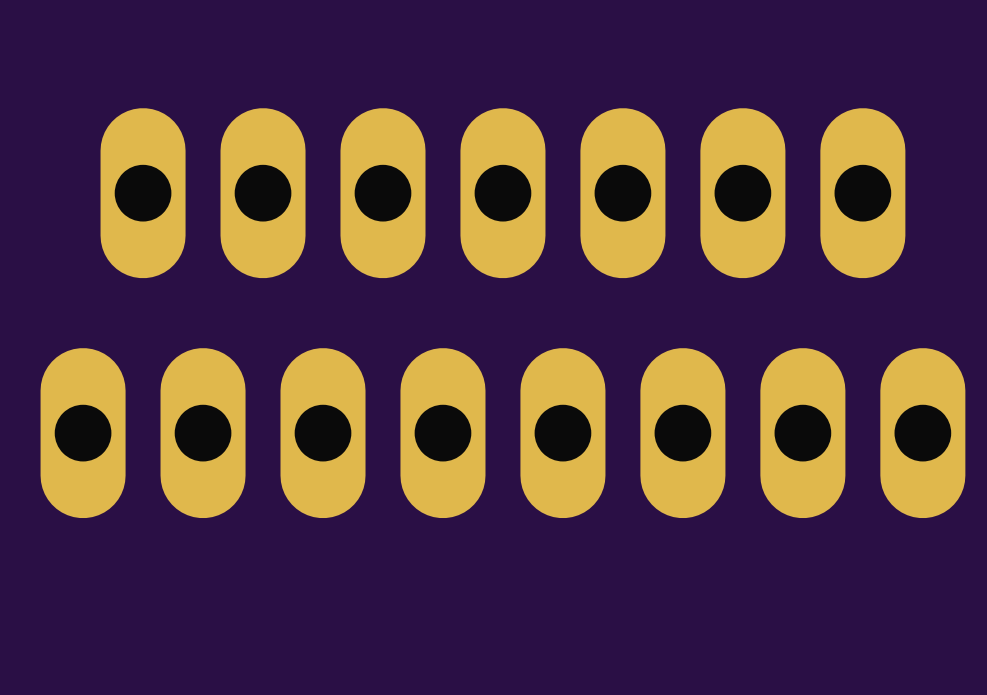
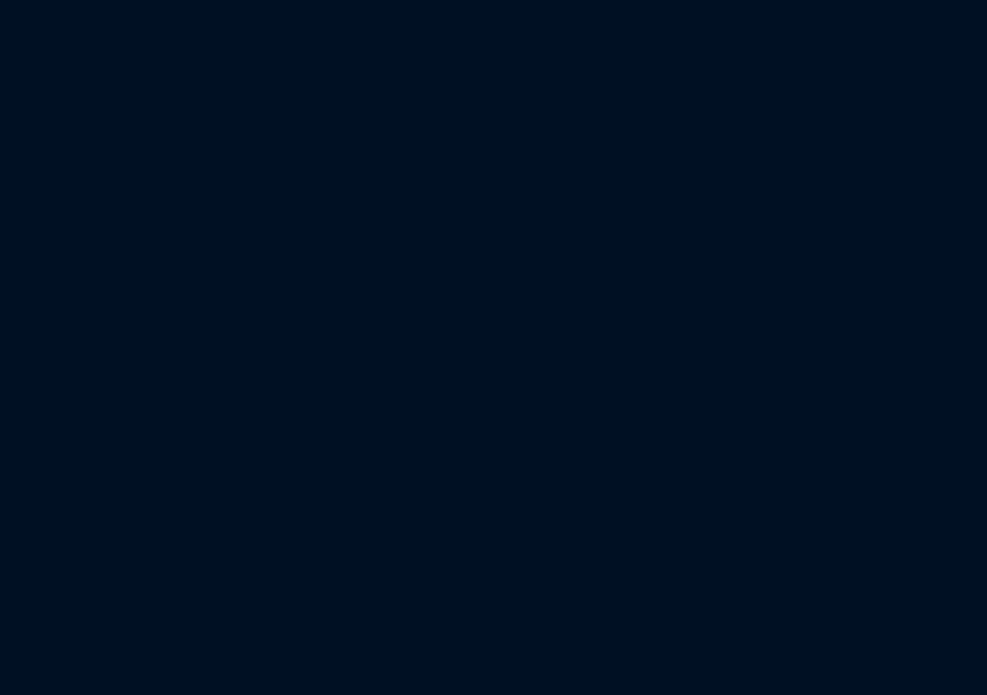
part: (502, 313) -> none

